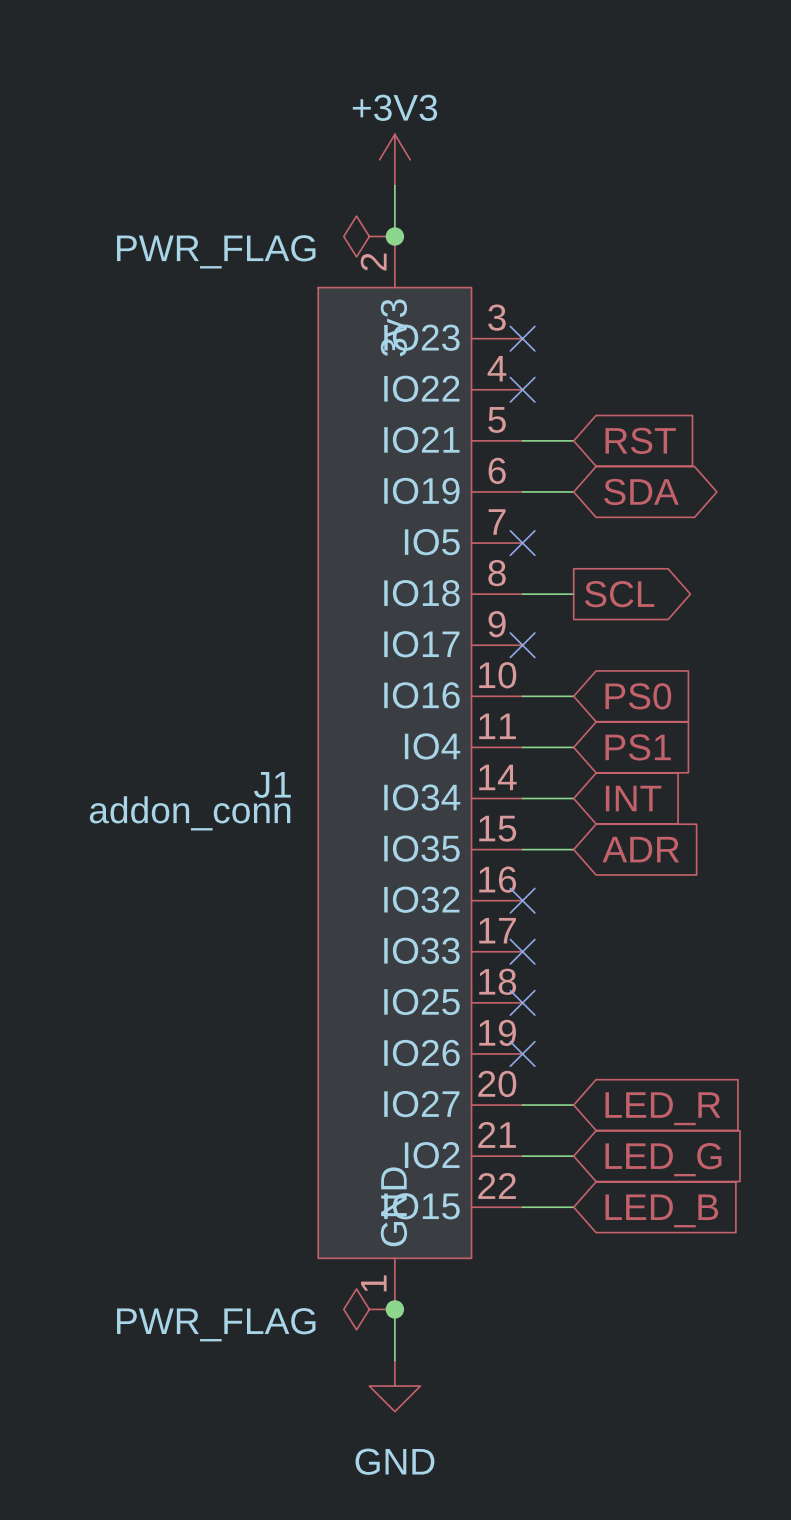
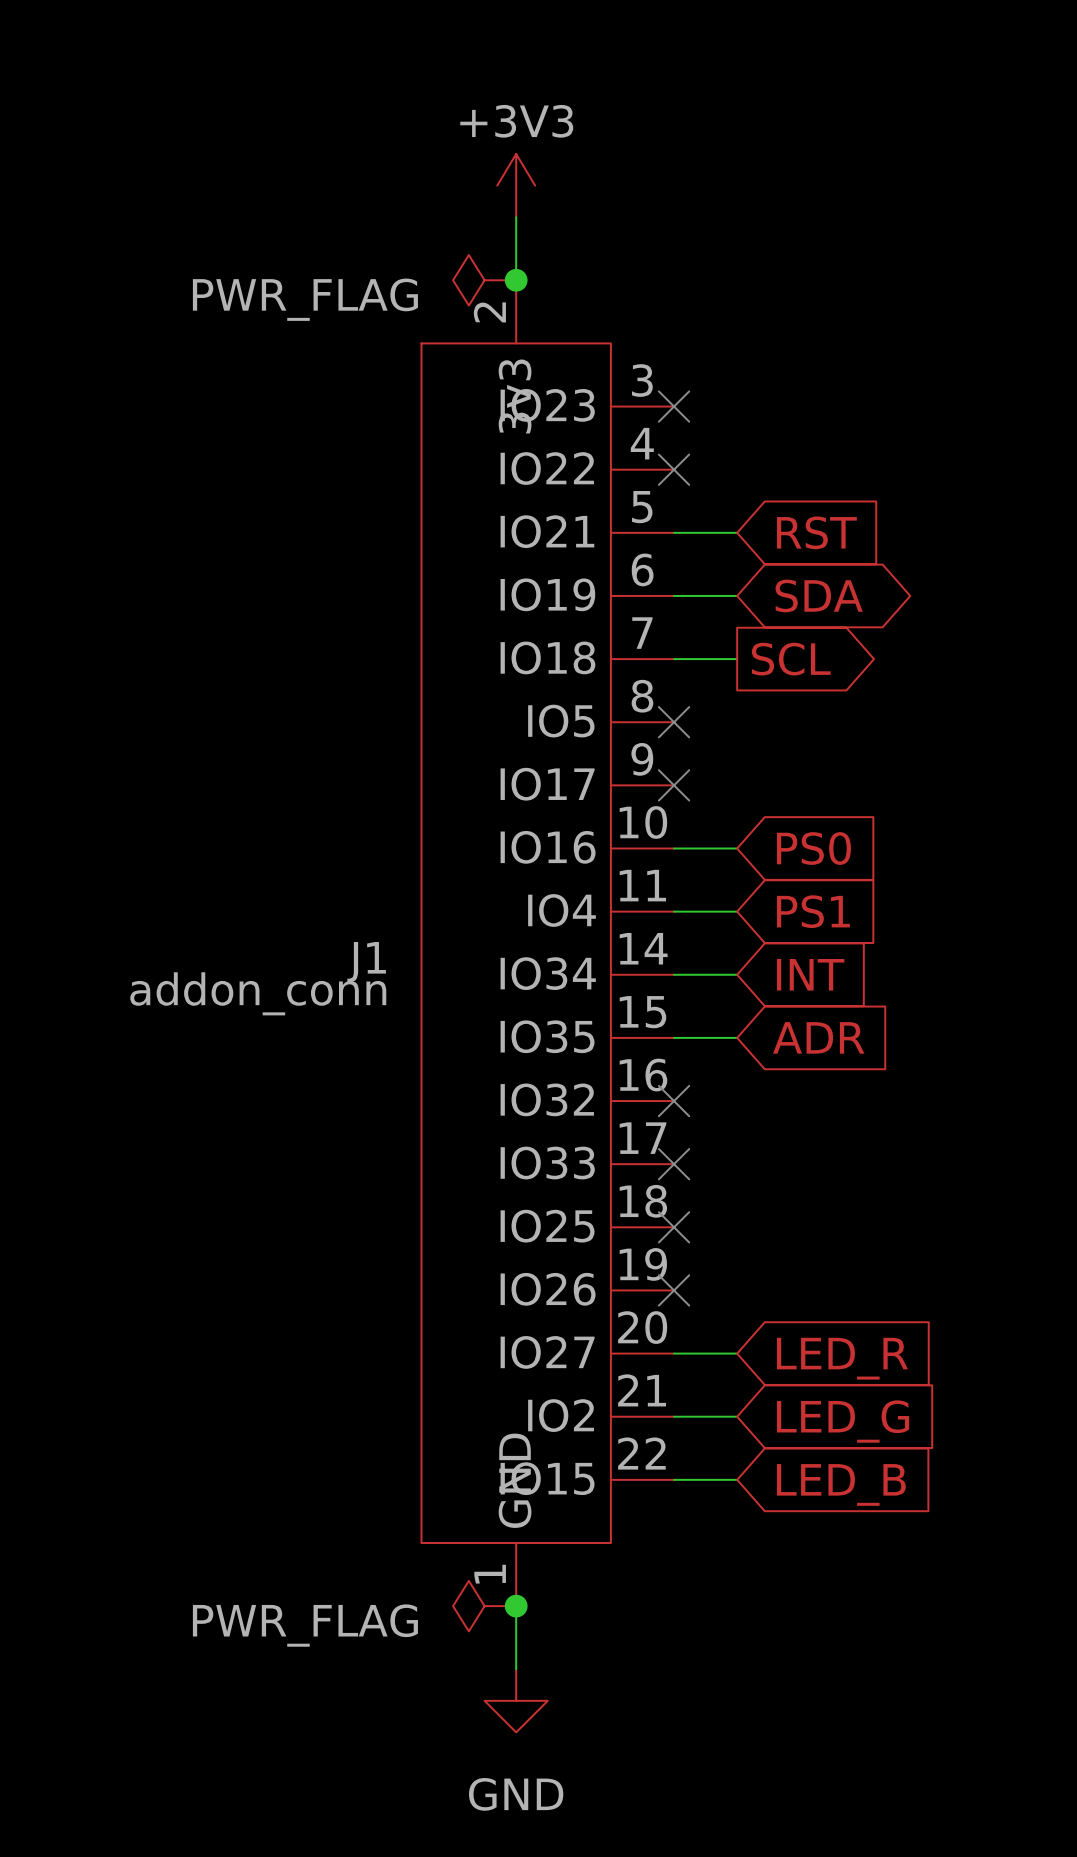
J1 pin name: IO5 (432, 542) -> IO18 (547, 657)
no-connect mark position: (522, 543) -> (674, 722)
J1 pin name: IO18 (421, 593) -> IO5 (561, 721)
wire: (522, 594) (573, 594) -> (674, 659) (737, 659)
global label position: SCL (619, 594) -> SCL (791, 659)

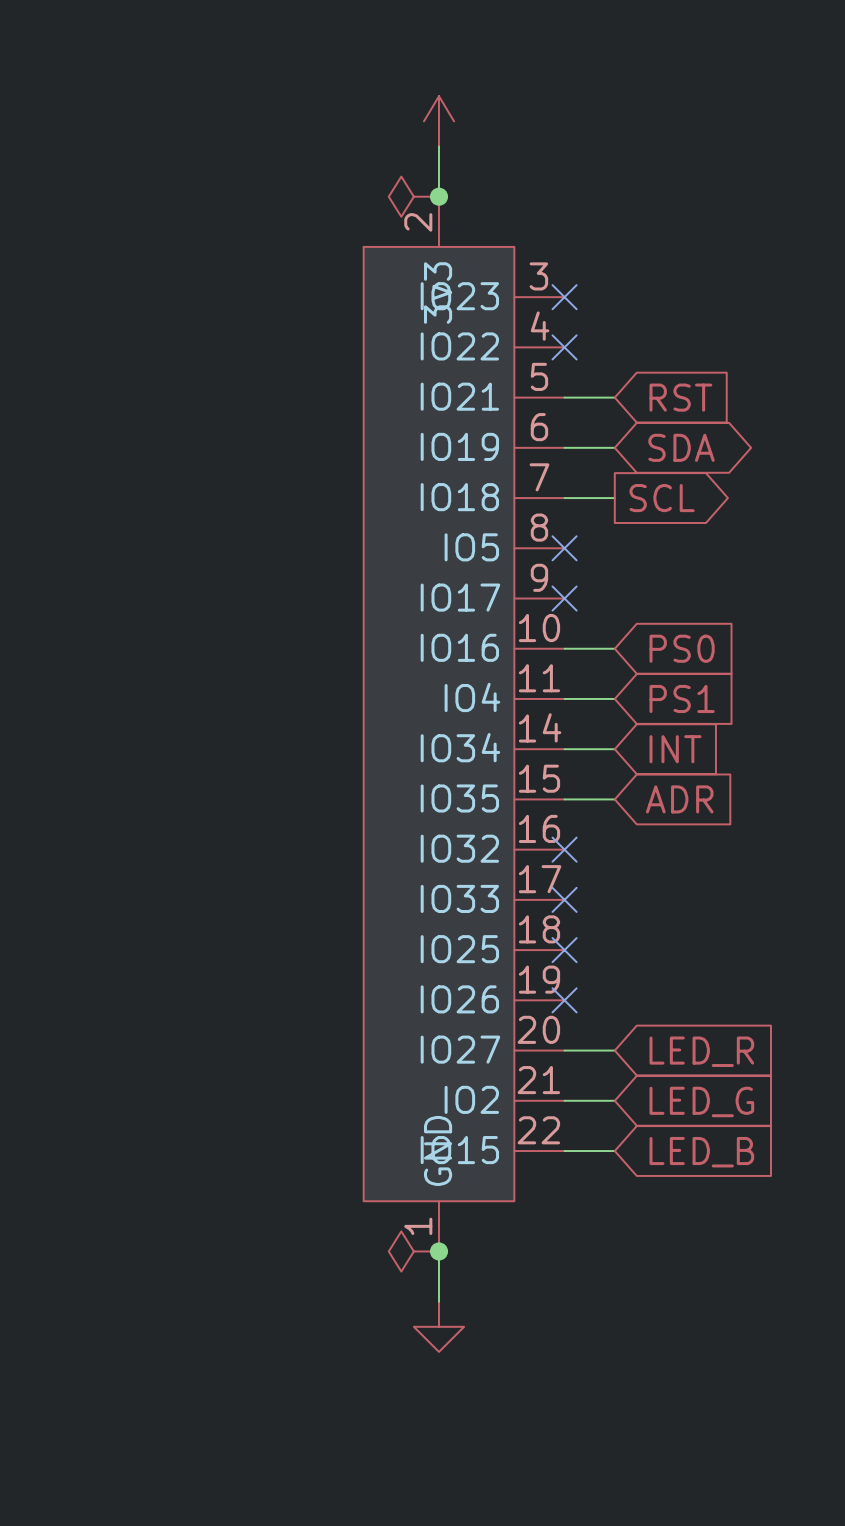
power symbol text: +3V3 (516, 121) -> none
power symbol text: PWR_FLAG (305, 299) -> none
J1 name: J1 (366, 962) -> none
J1 value: addon_conn (258, 993) -> none
power symbol text: PWR_FLAG (305, 1625) -> none
power symbol text: GND (516, 1794) -> none

